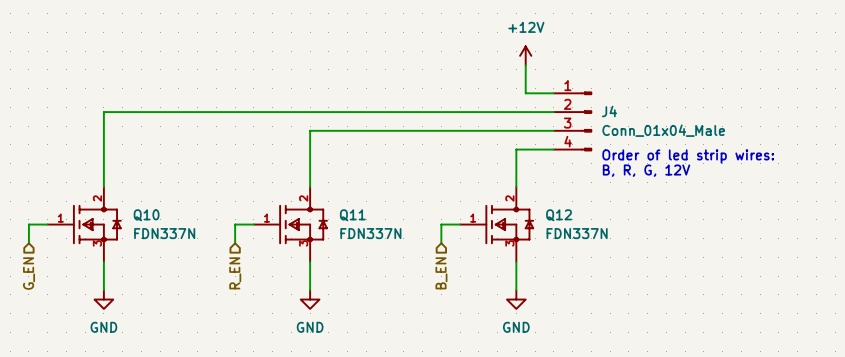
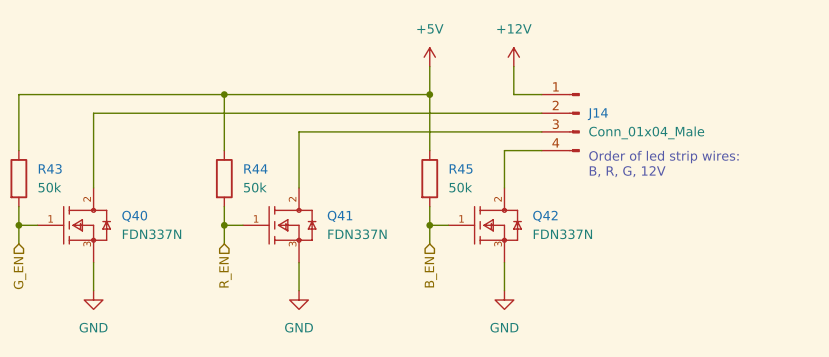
power symbol: none -> +5V (429, 57)
wire: none -> (429, 66) (429, 150)
wire: none -> (224, 94) (224, 150)
junction: none -> (224, 94)
wire: none -> (429, 94) (18, 94) (18, 150)
junction: none -> (429, 94)
J4 name: J4 (609, 111) -> J14 (597, 114)
R43: none -> 50k (18, 178)
R44: none -> 50k (224, 178)
R45: none -> 50k (429, 178)
wire: none -> (18, 206) (18, 225)
wire: none -> (224, 206) (224, 225)
wire: none -> (429, 206) (429, 225)
Q10 name: Q10 (146, 215) -> Q40 (134, 216)
Q11 name: Q11 (352, 215) -> Q41 (340, 216)
Q12 name: Q12 (559, 215) -> Q42 (545, 216)
junction: none -> (18, 225)
junction: none -> (224, 225)
junction: none -> (429, 225)

